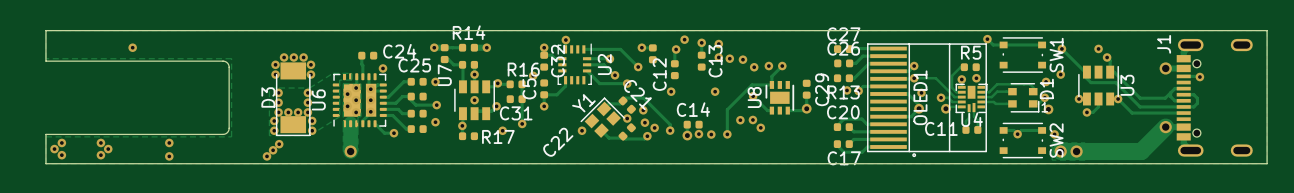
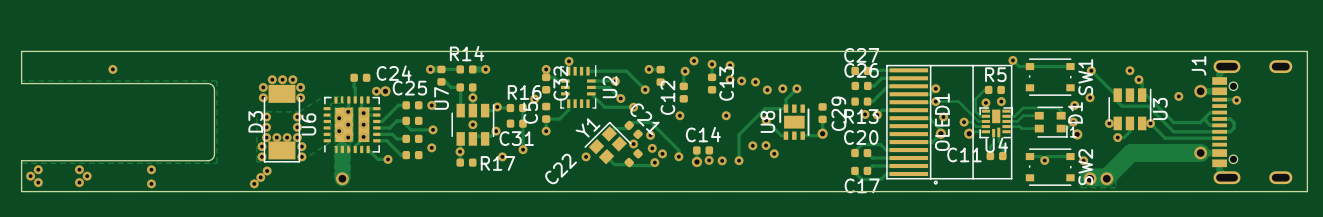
via: none -> (385, 91)
via: none -> (1178, 96)
track: (1165, 127) (1141, 151) (1060, 151) -> (1200, 153) (1131, 153) (1106, 177) (1088, 177)

